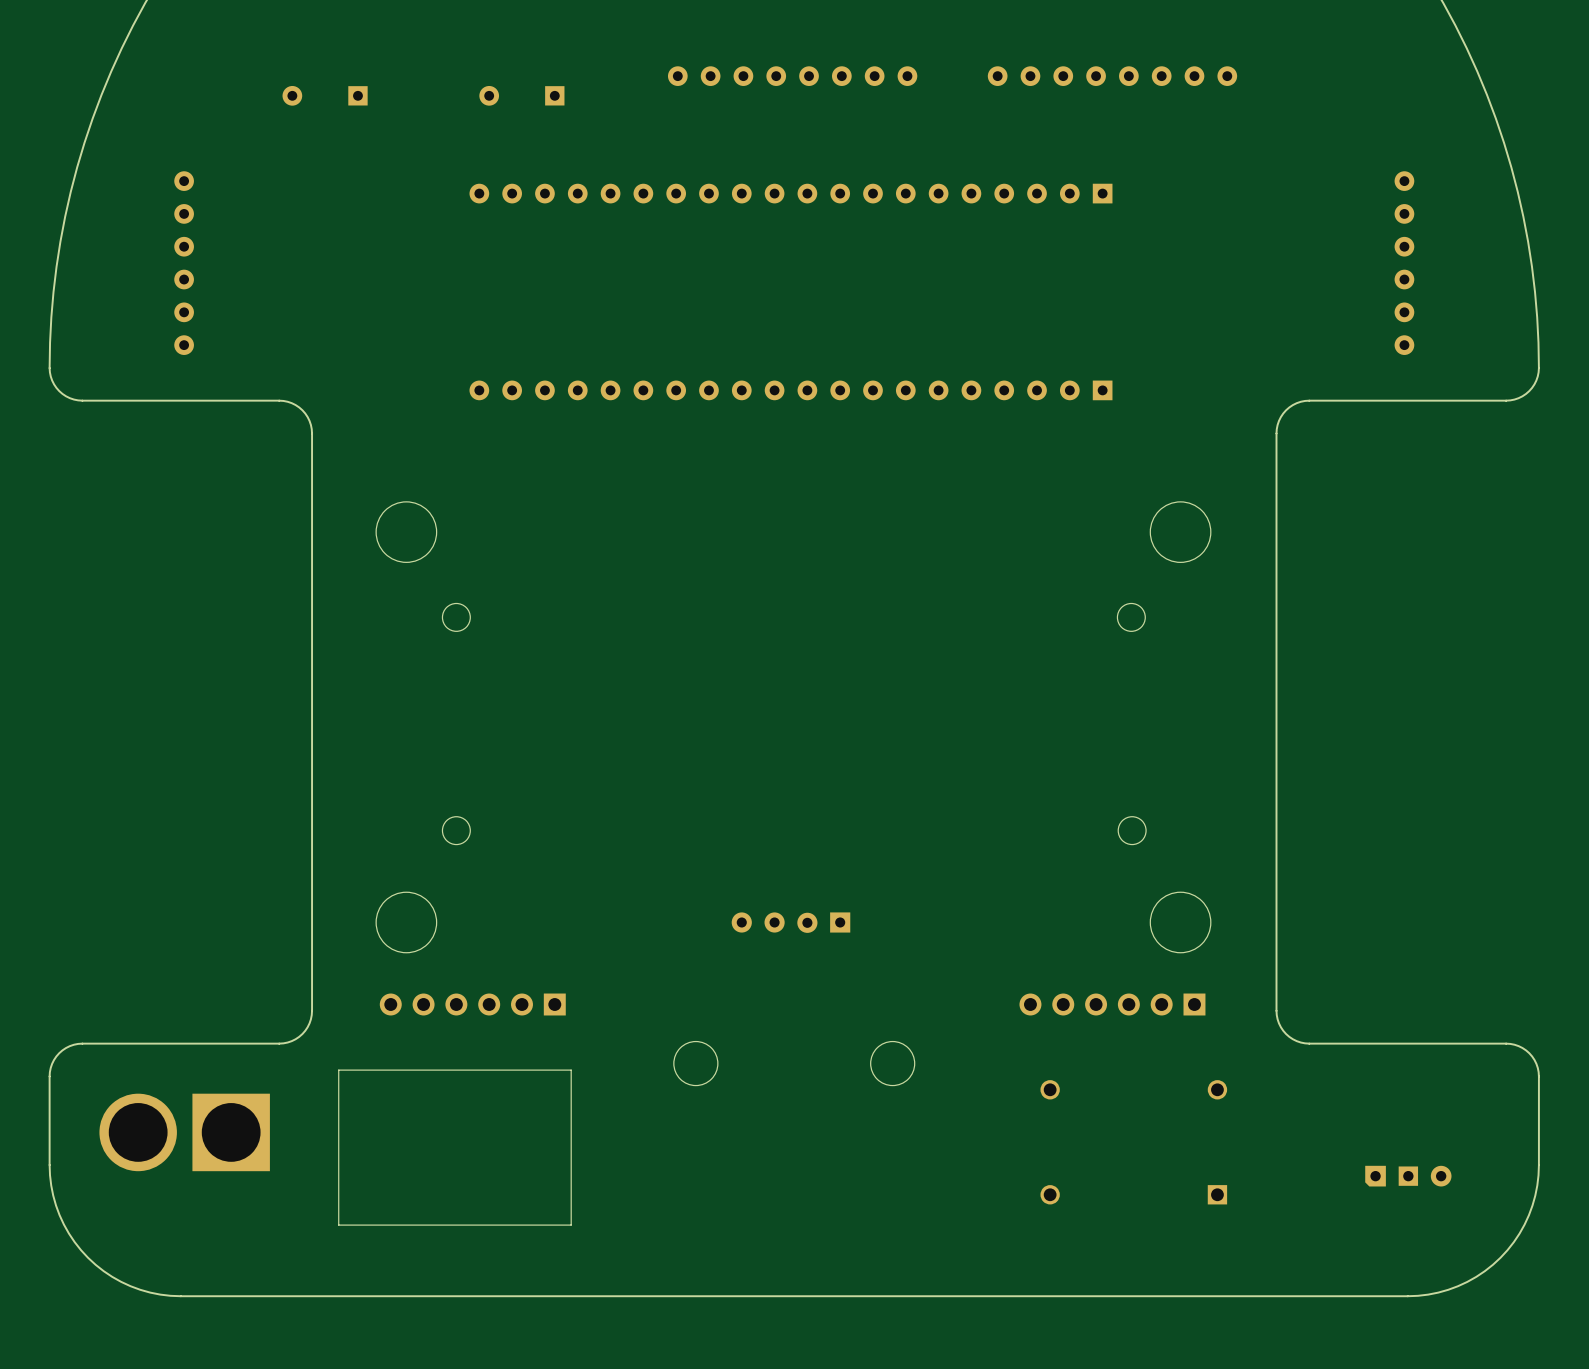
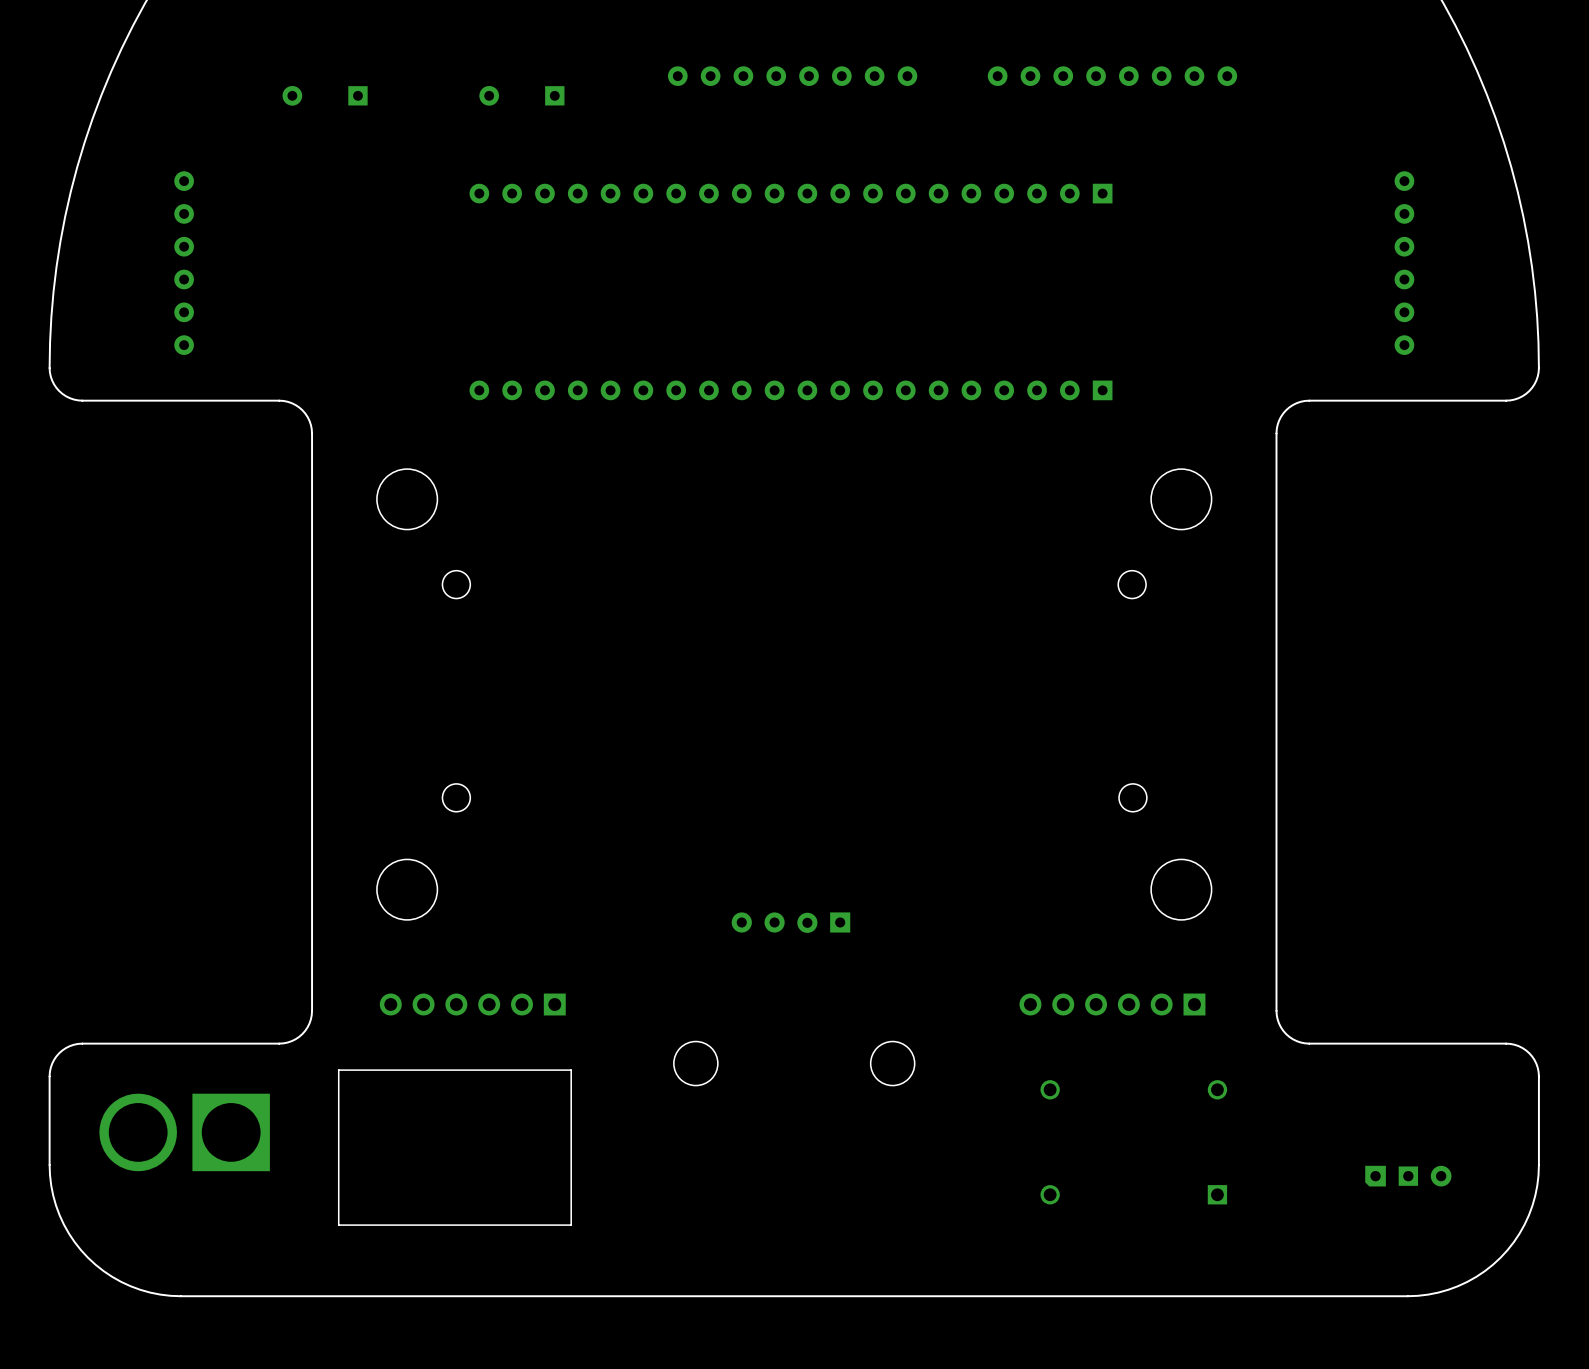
round board edge position: (406, 532) -> (407, 499)
round board edge position: (1180, 532) -> (1181, 499)
round board edge position: (456, 617) -> (456, 584)
round board edge position: (1131, 617) -> (1132, 584)
round board edge position: (456, 830) -> (456, 797)
round board edge position: (1132, 830) -> (1132, 797)
round board edge position: (406, 922) -> (407, 889)
round board edge position: (1180, 922) -> (1181, 889)

